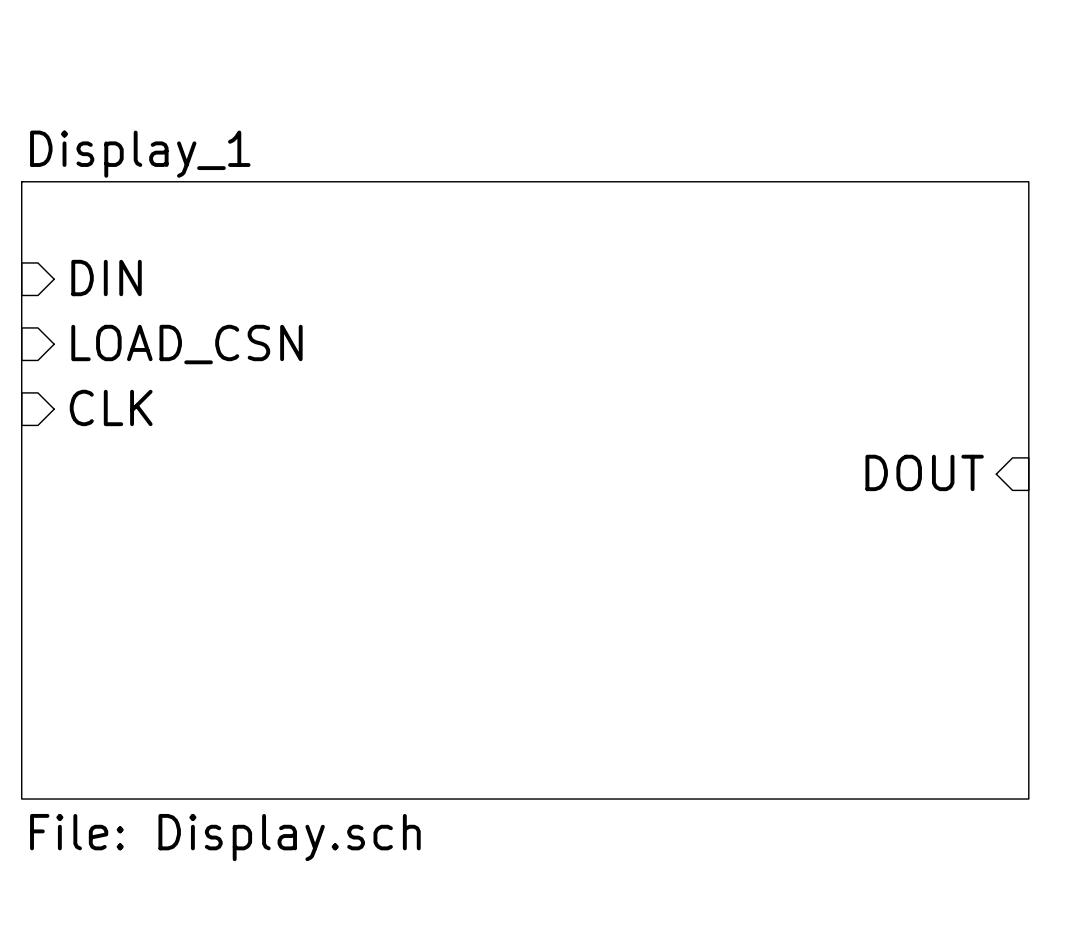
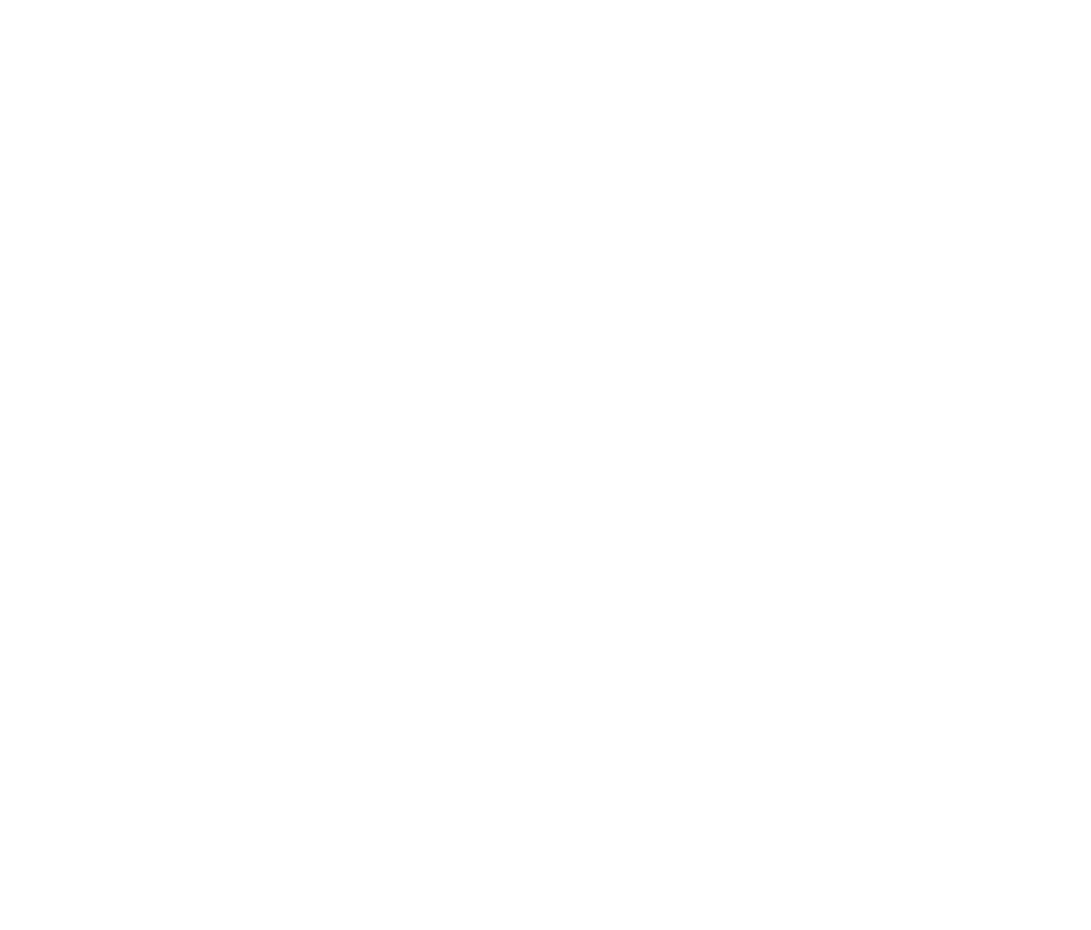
sheet pin: DIN (106, 278) -> none
sheet pin: LOAD_CSN (186, 344) -> none
sheet pin: CLK (111, 407) -> none
sheet pin: DOUT (924, 472) -> none
sheet Display_1: File: Display.sch (525, 490) -> none

